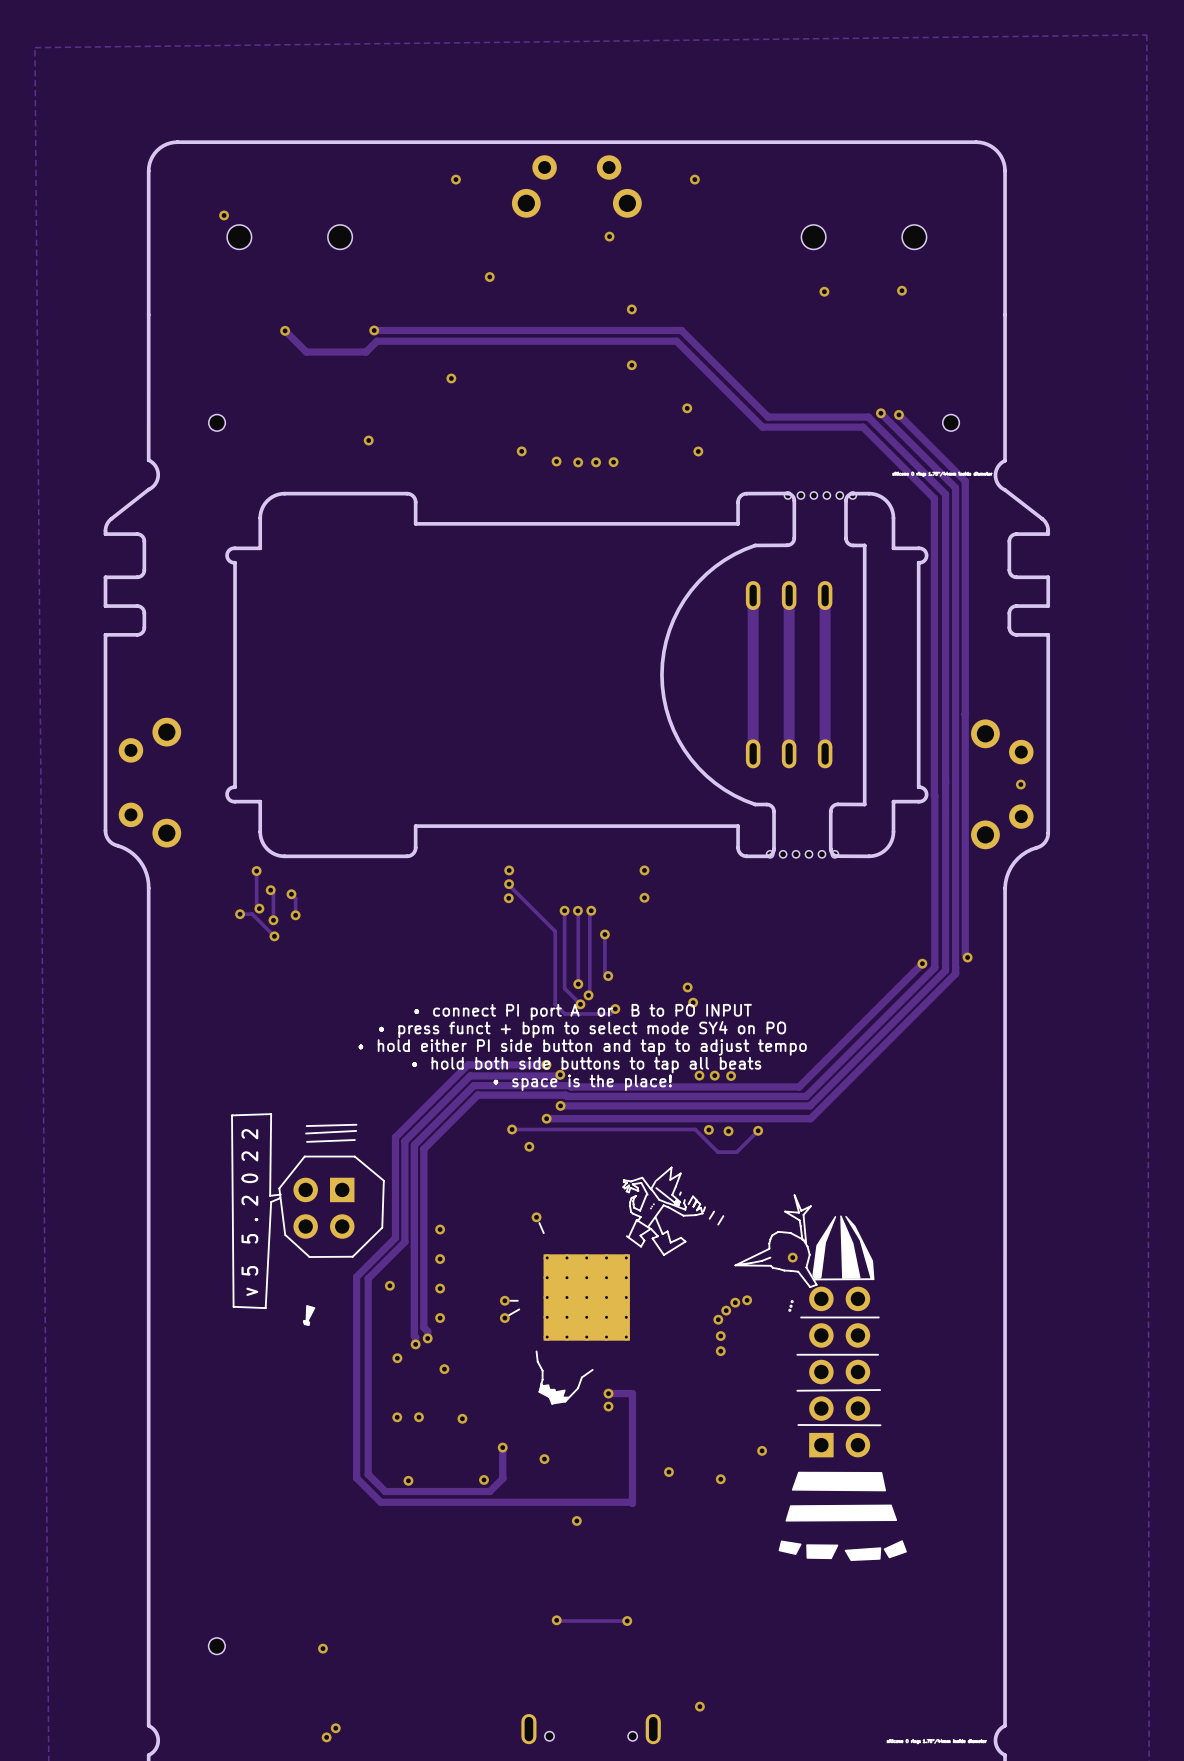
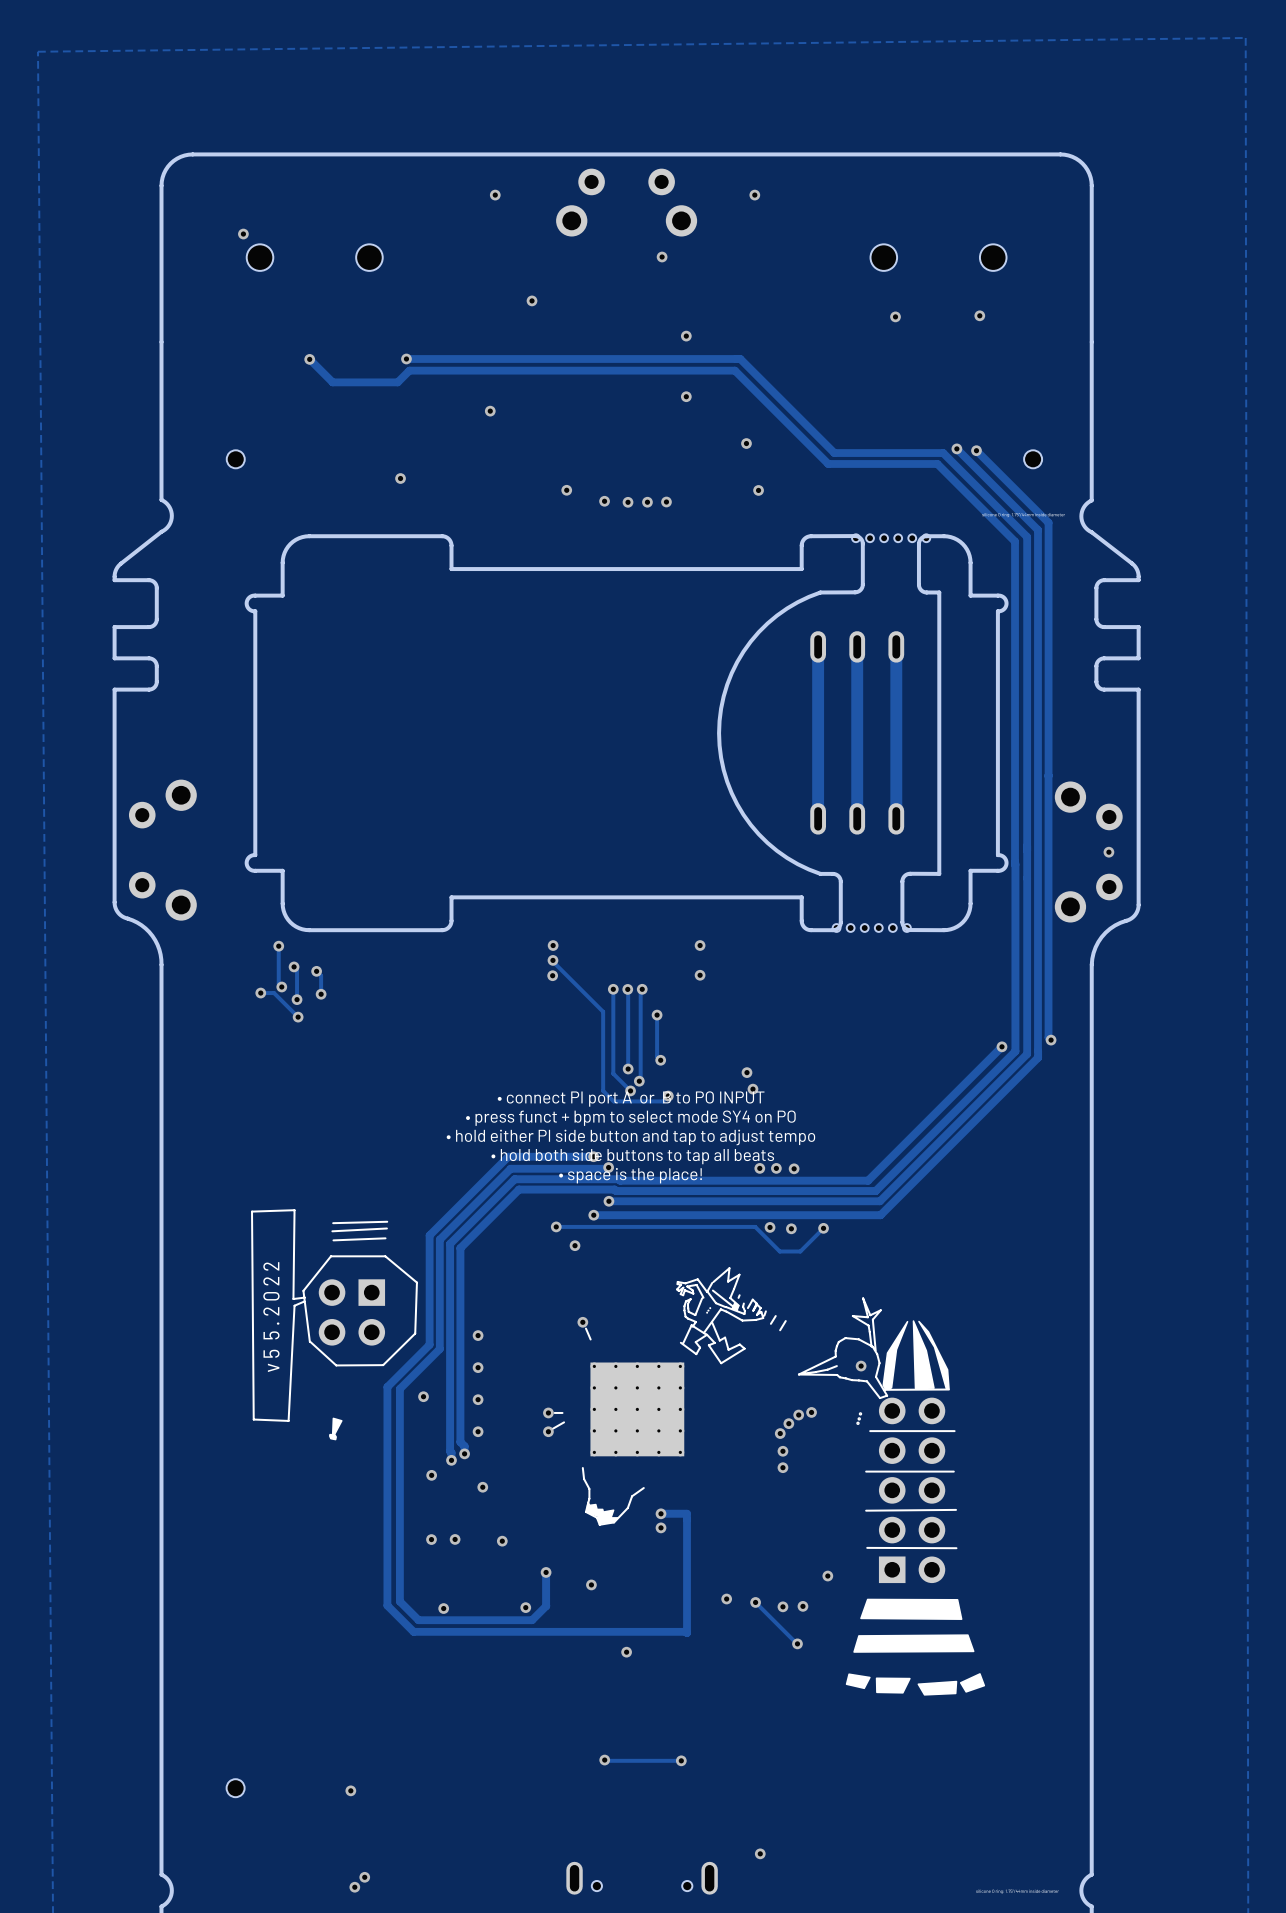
track: none -> (755, 1602) (797, 1643)
via: none -> (755, 1602)
via: none -> (802, 1606)
via: none -> (797, 1643)

